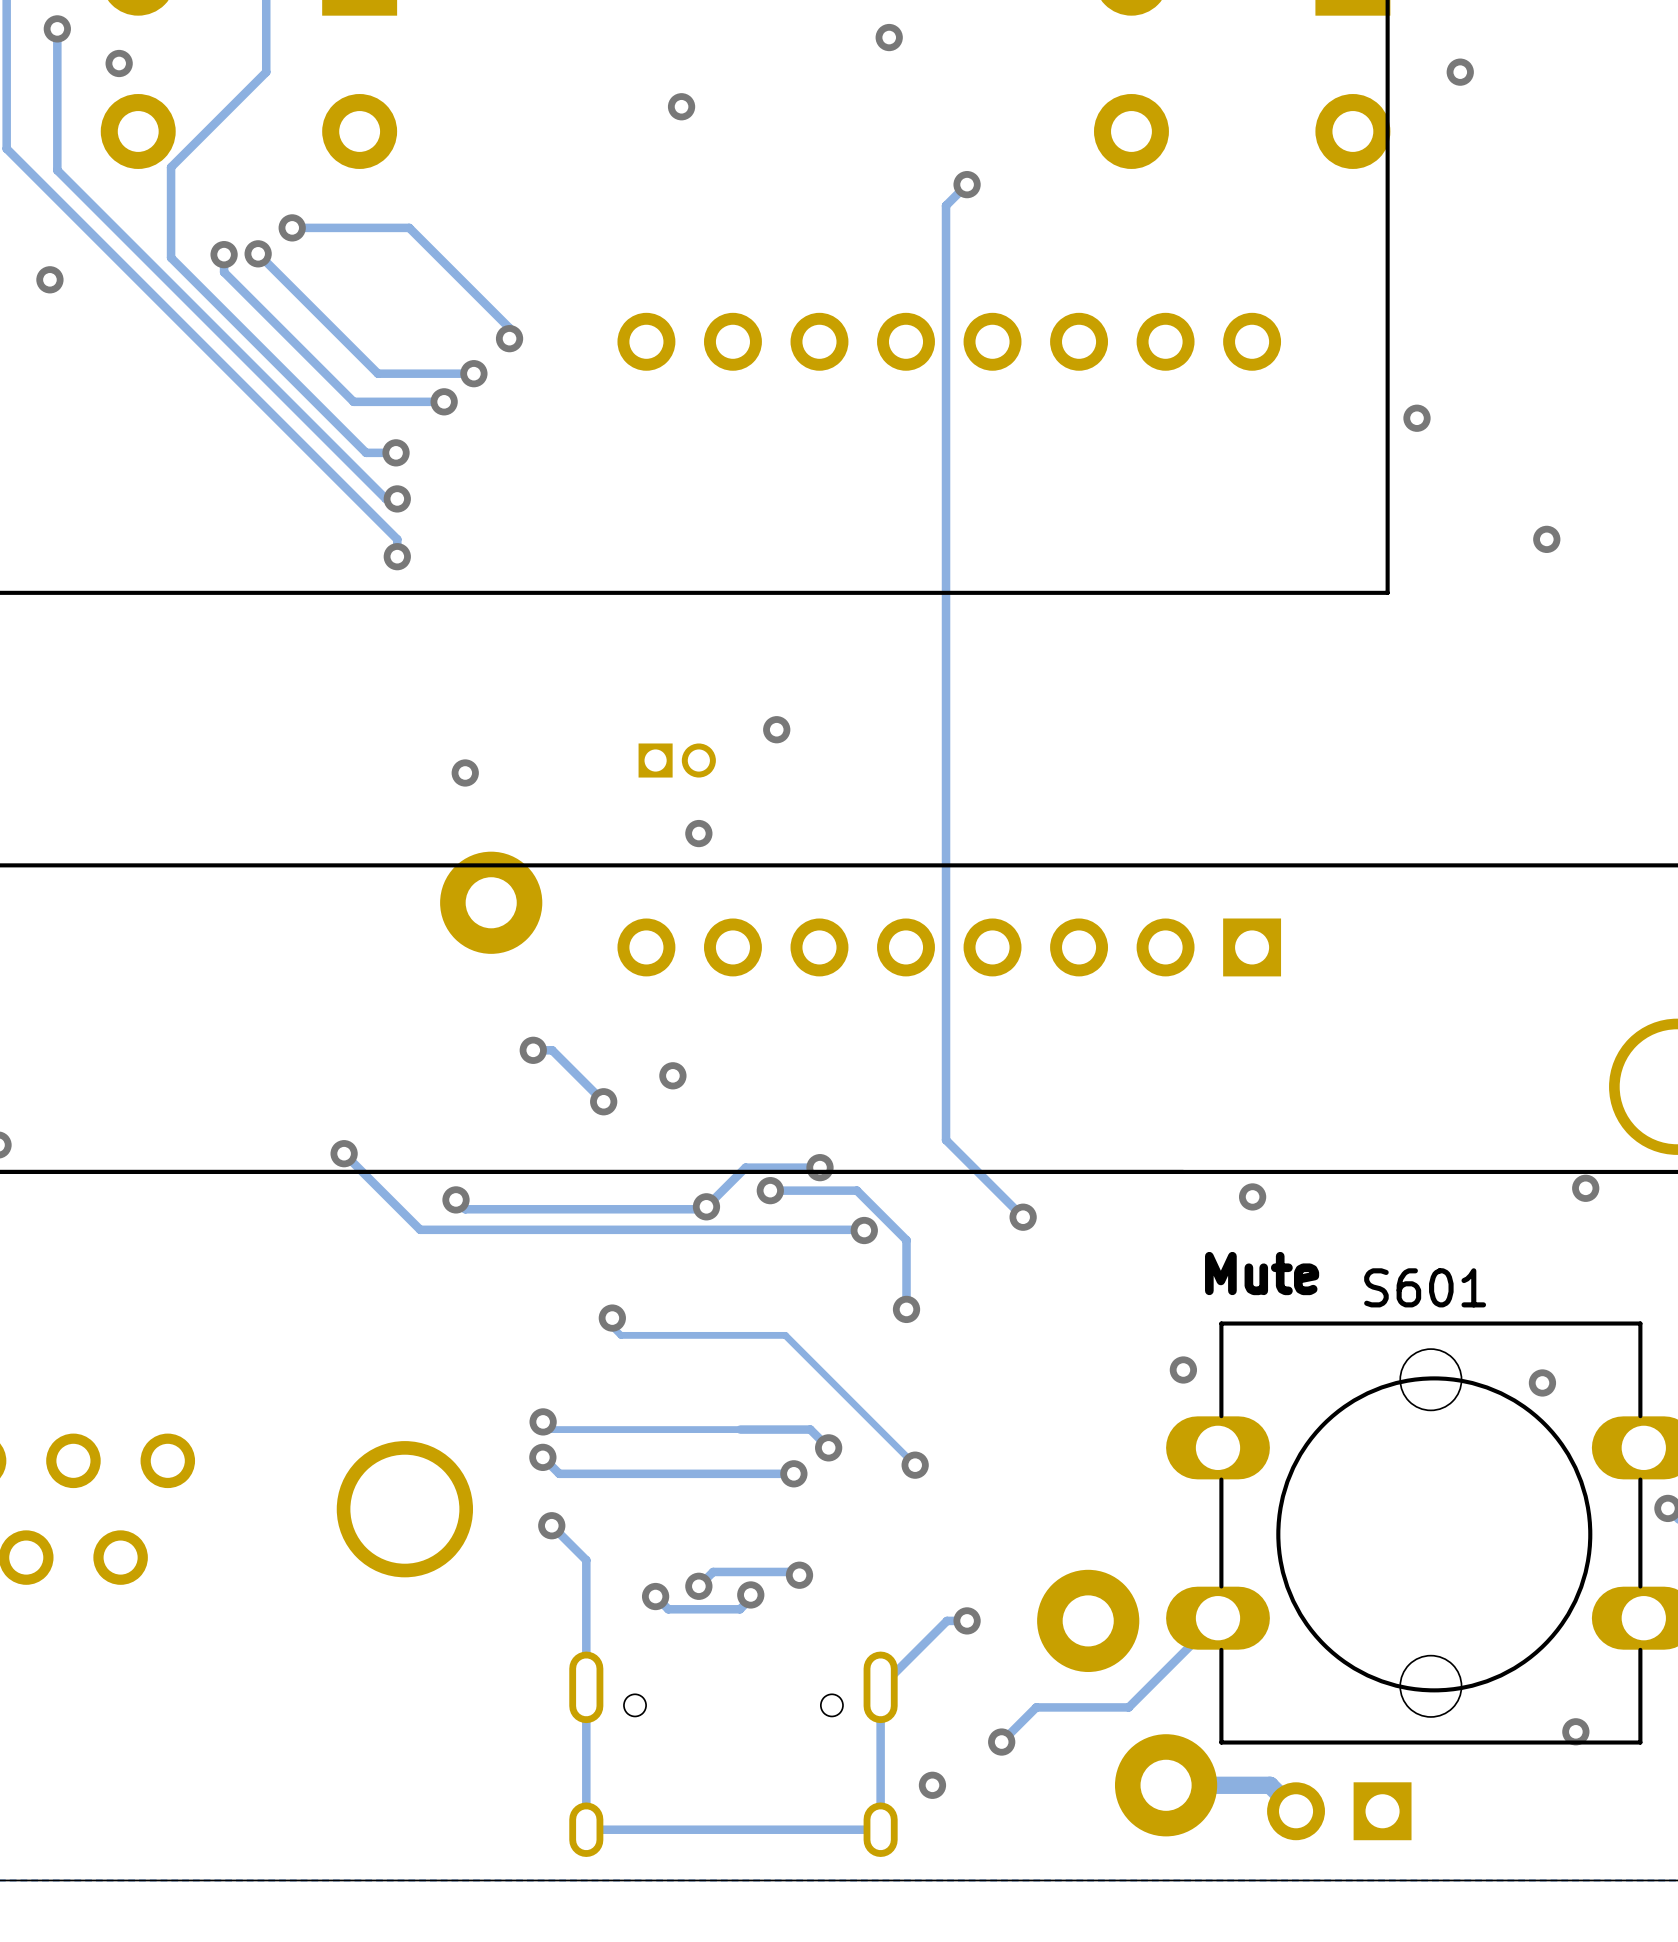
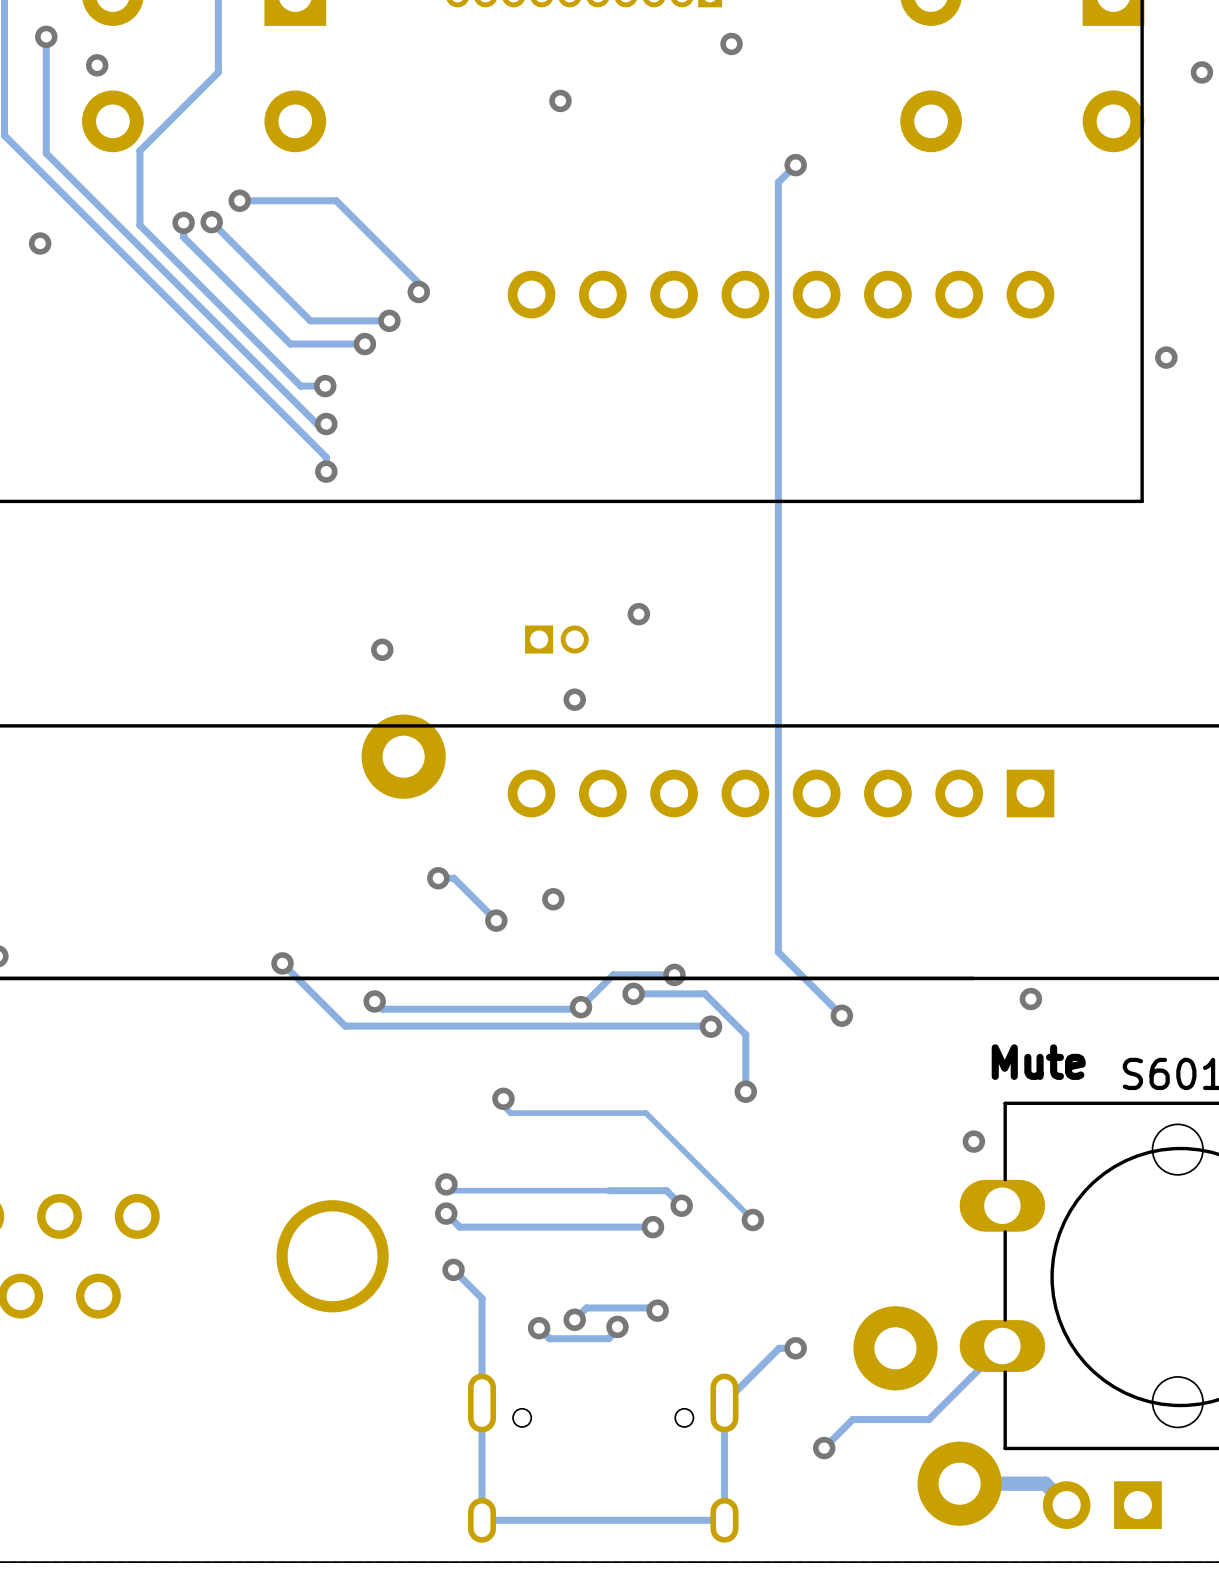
via: (932, 1785) -> none

